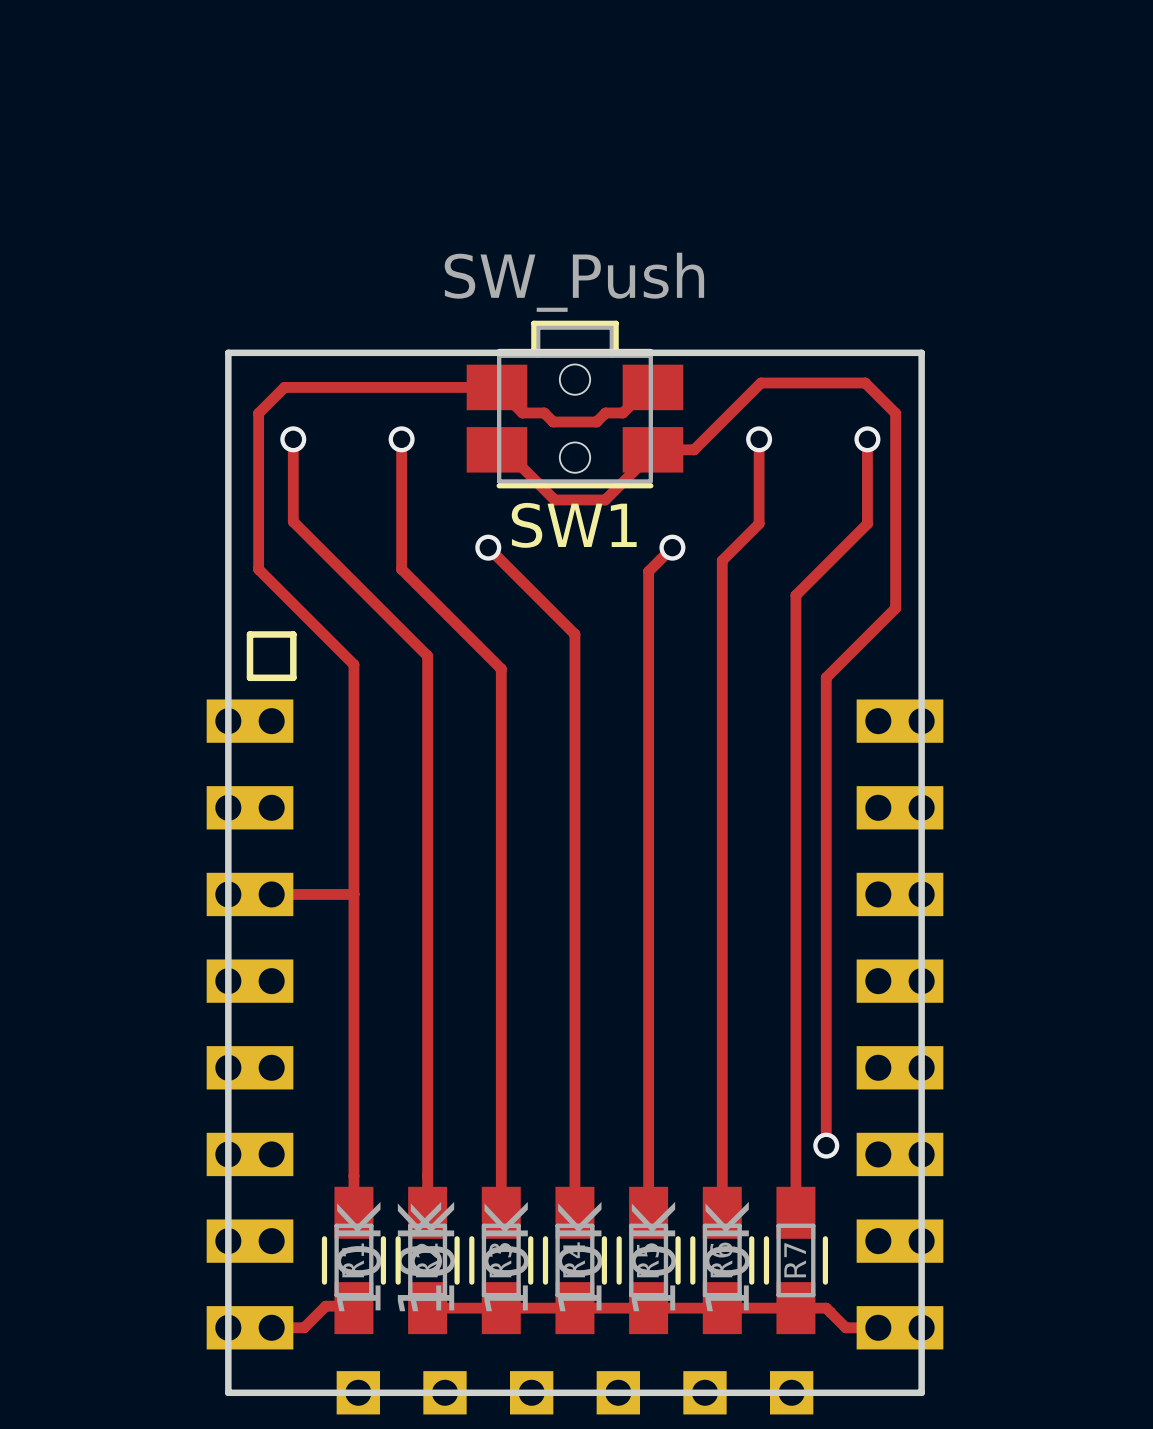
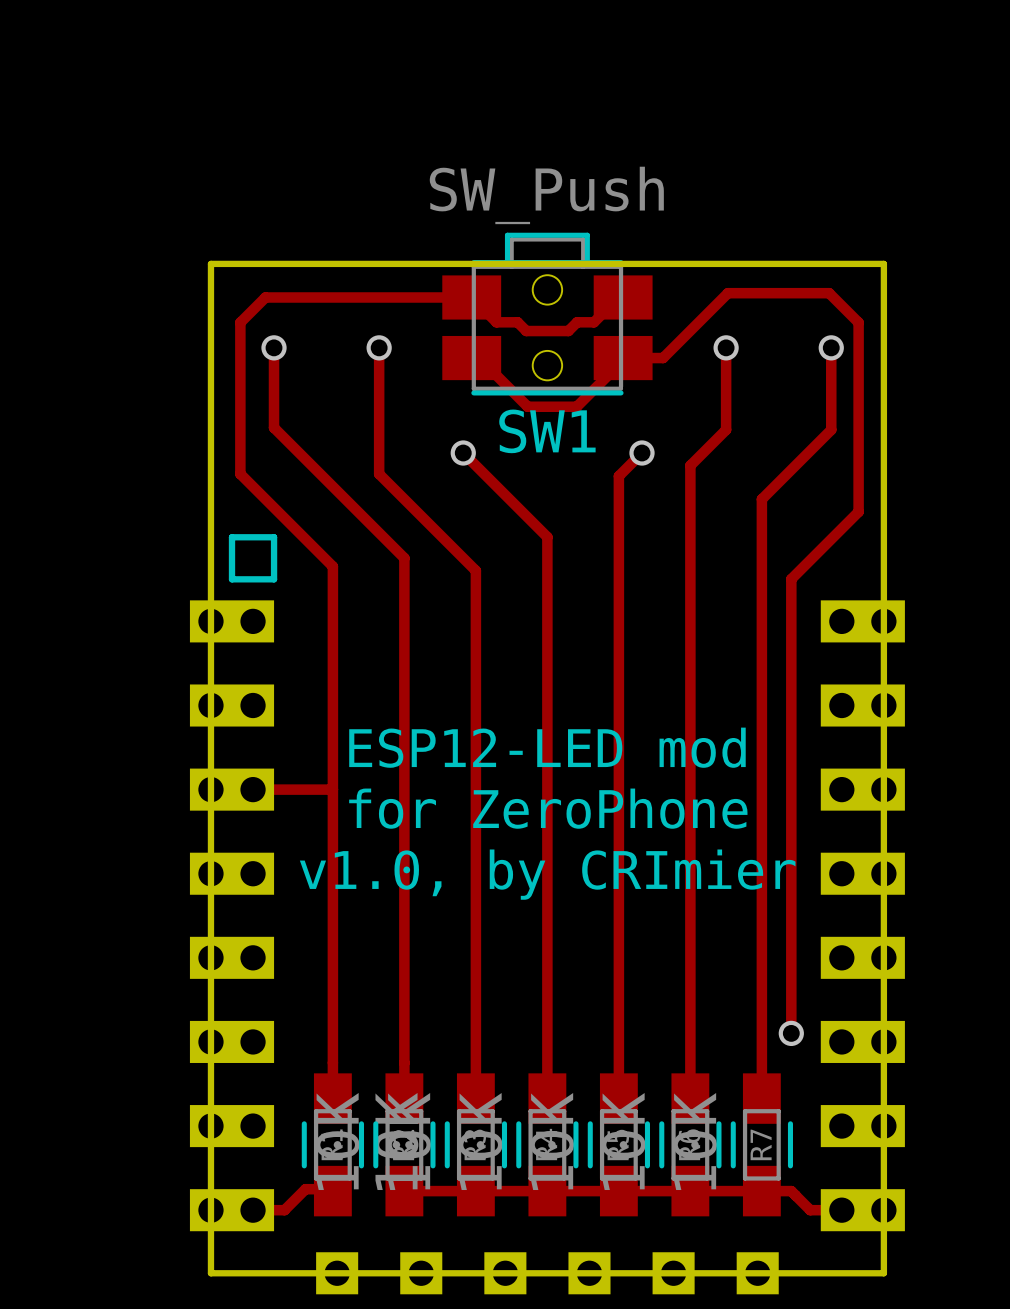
text: none -> ESP12-LED mod (547, 747)
text: none -> for ZeroPhone (548, 808)
text: none -> v1.0, by CRImier (547, 874)

